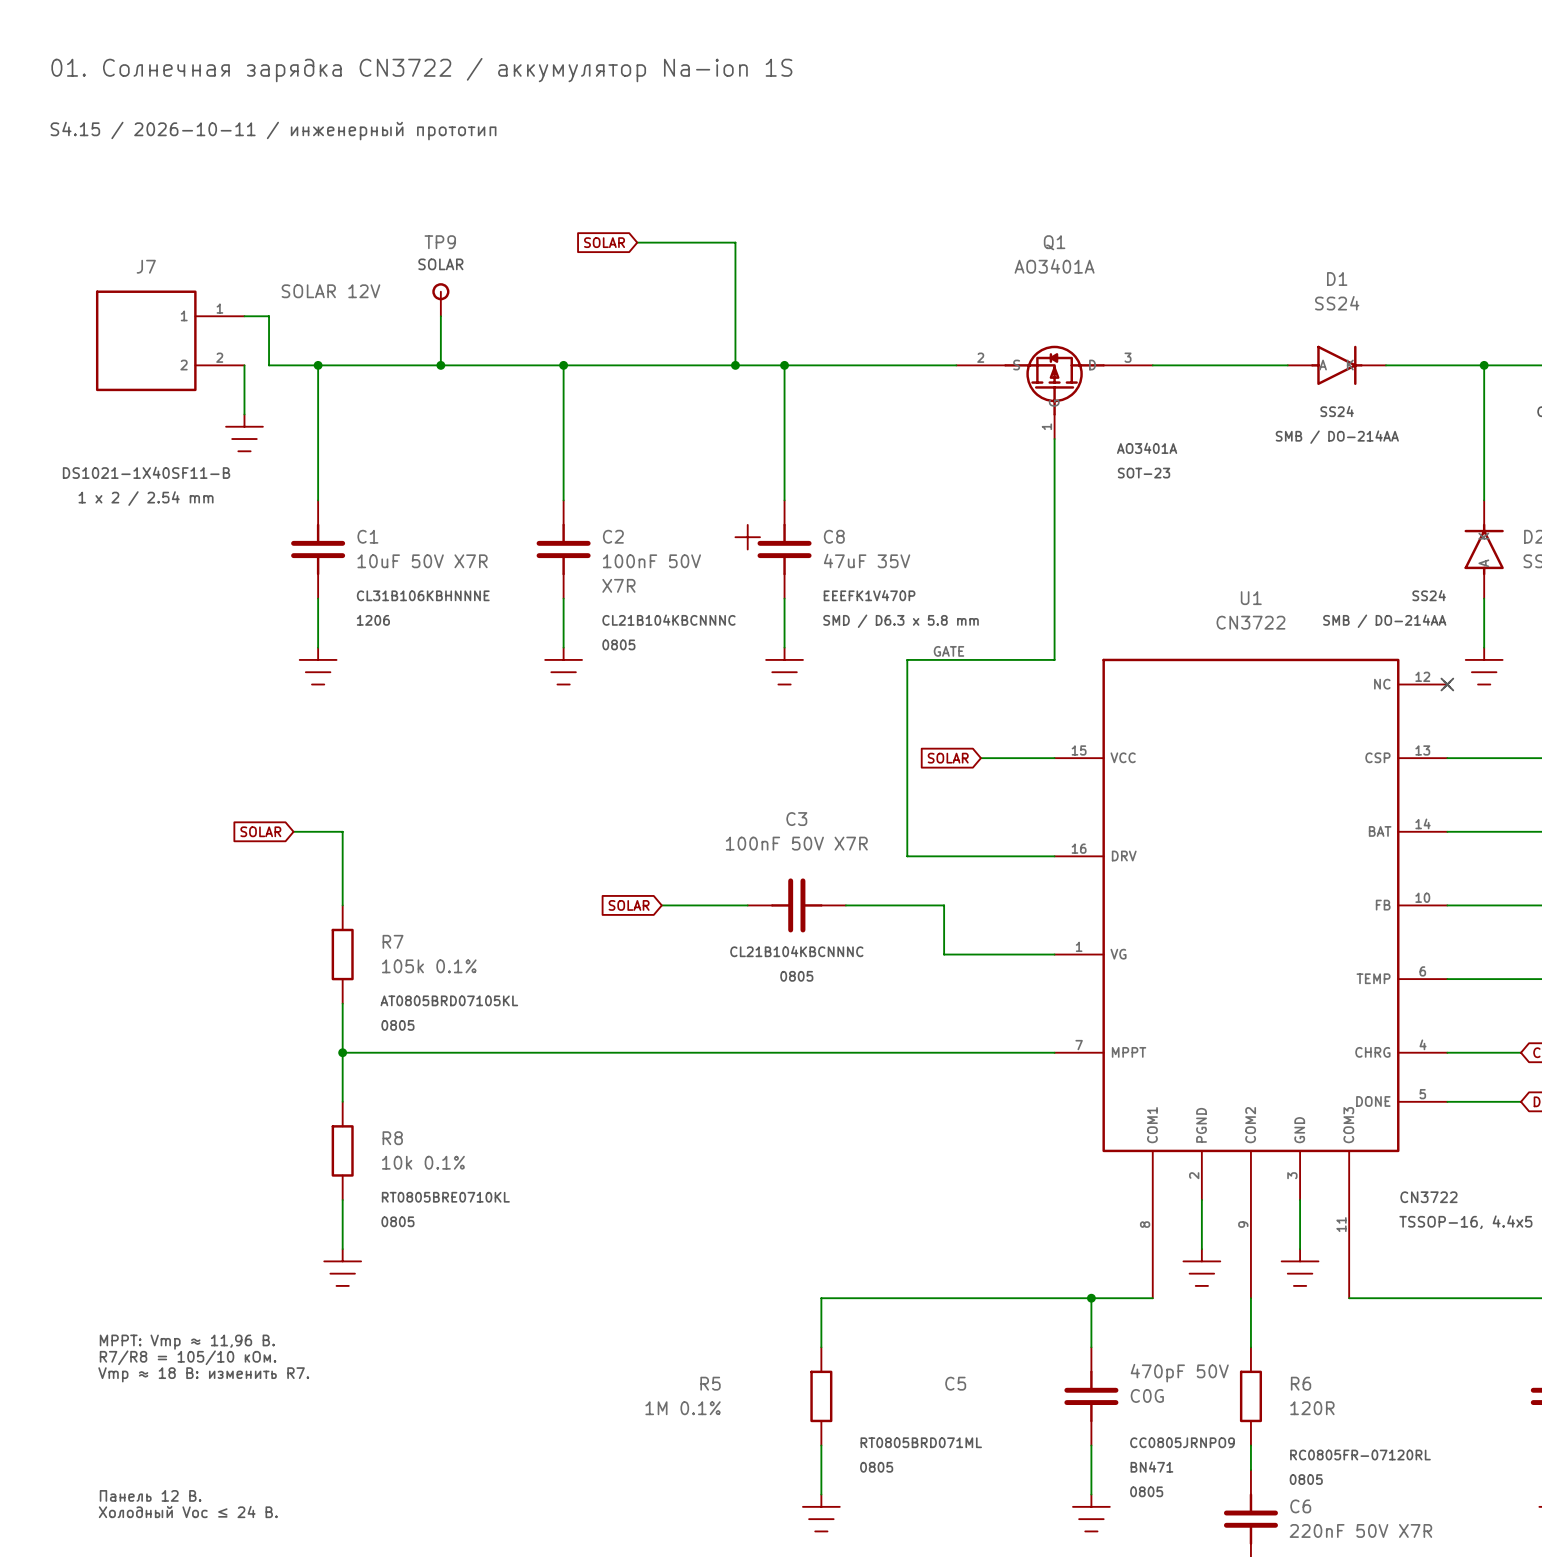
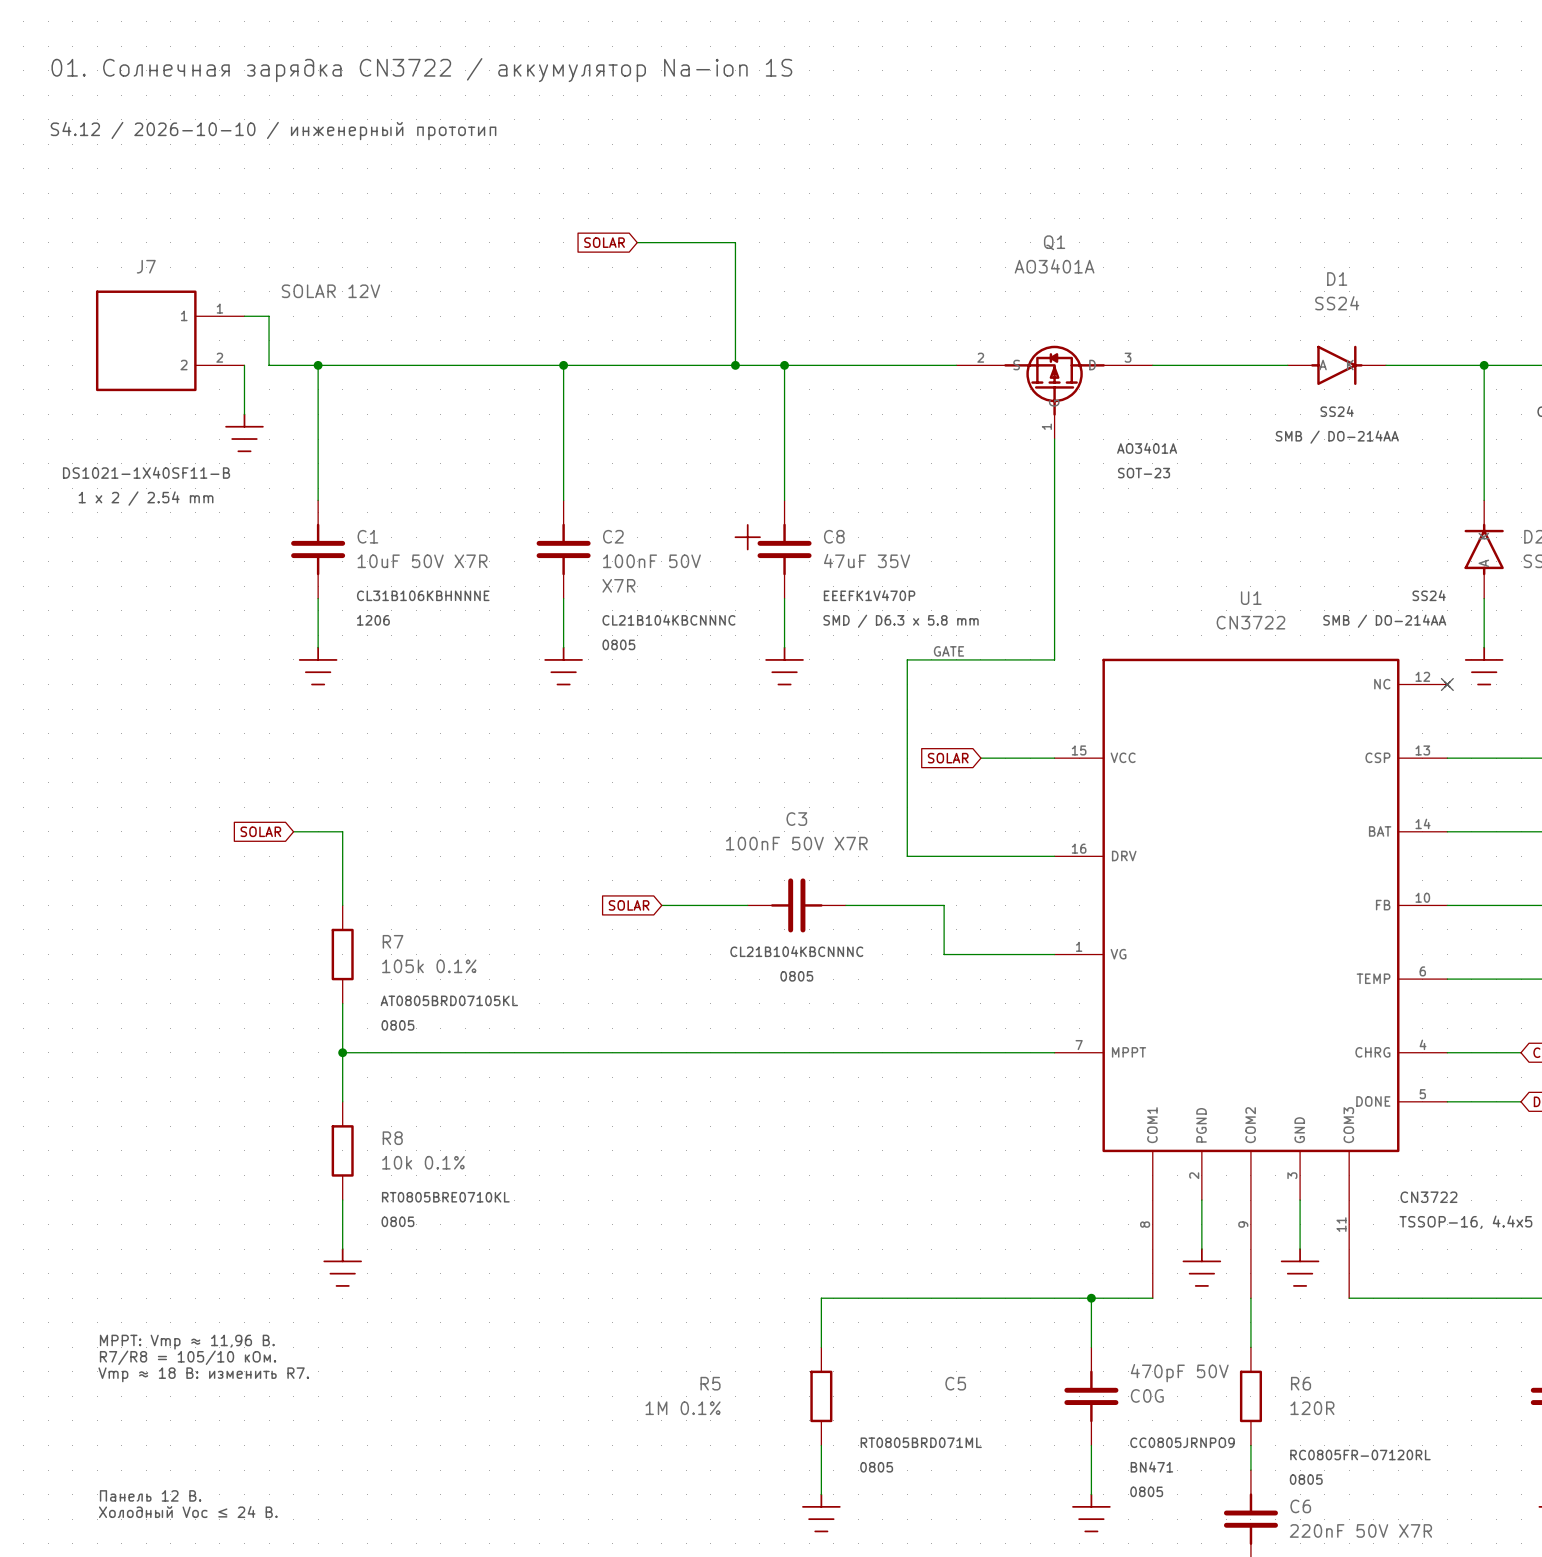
text: S4.15 / 2026-10-11 / инженерный прототип (273, 131) -> S4.12 / 2026-10-10 / инженерный прототип (273, 131)
text: SOLAR (440, 264) -> none
TP9: (440, 299) -> none
wire: (440, 316) (440, 365) -> none
junction: (440, 365) -> none

